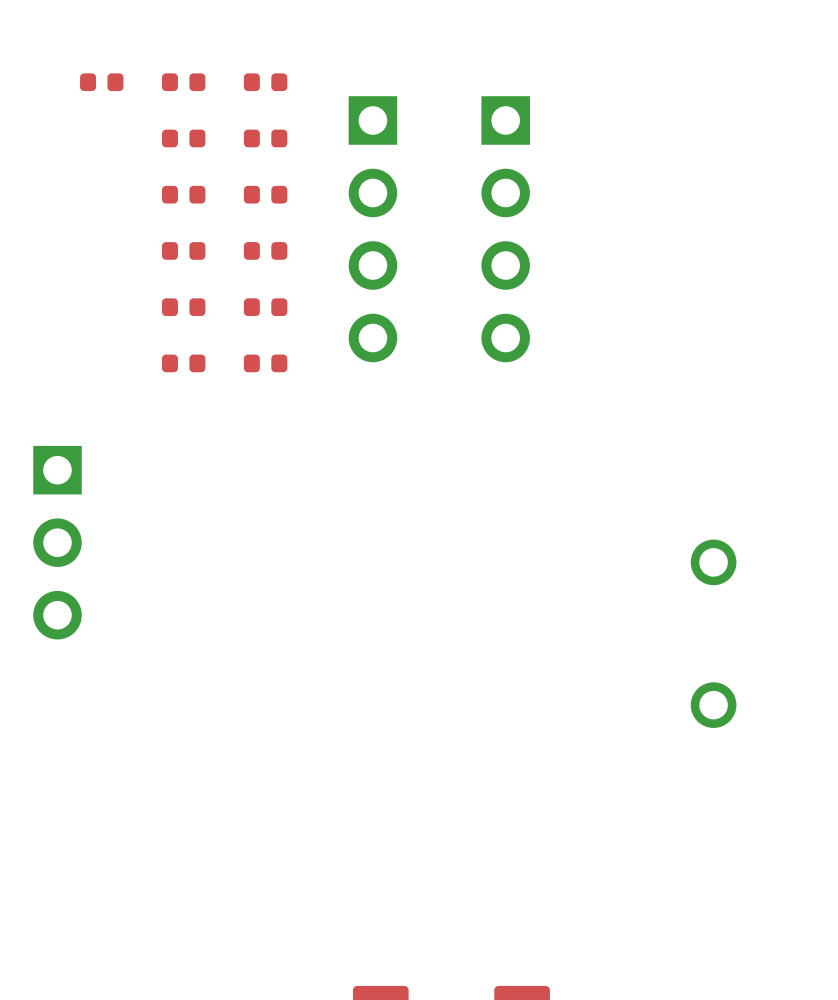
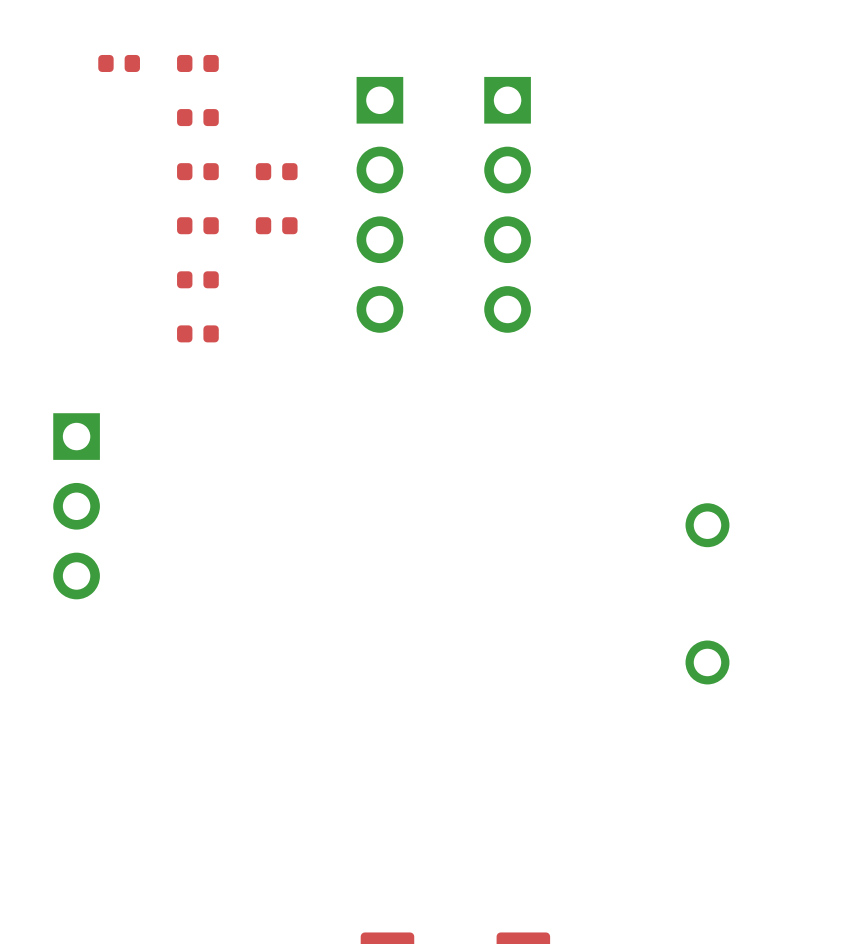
part: (265, 82) -> none
part: (265, 138) -> none
part: (265, 307) -> none
part: (265, 363) -> none

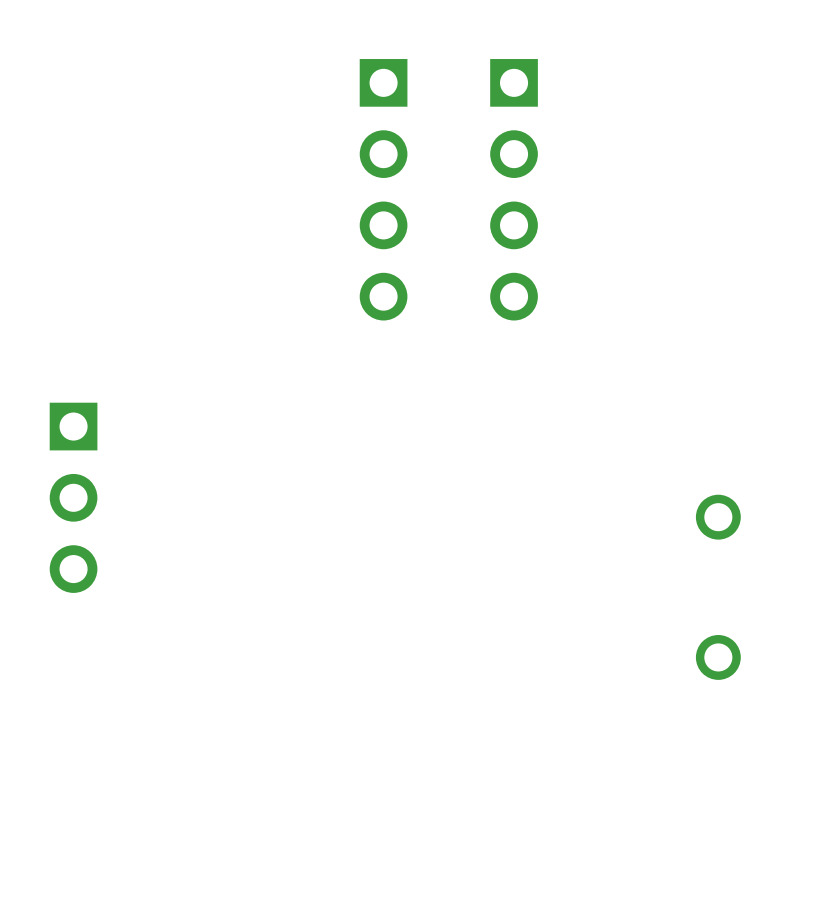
part: (119, 63) -> none
part: (197, 63) -> none
part: (197, 117) -> none
part: (197, 171) -> none
part: (276, 171) -> none
part: (197, 225) -> none
part: (276, 225) -> none
part: (197, 279) -> none
part: (197, 333) -> none

